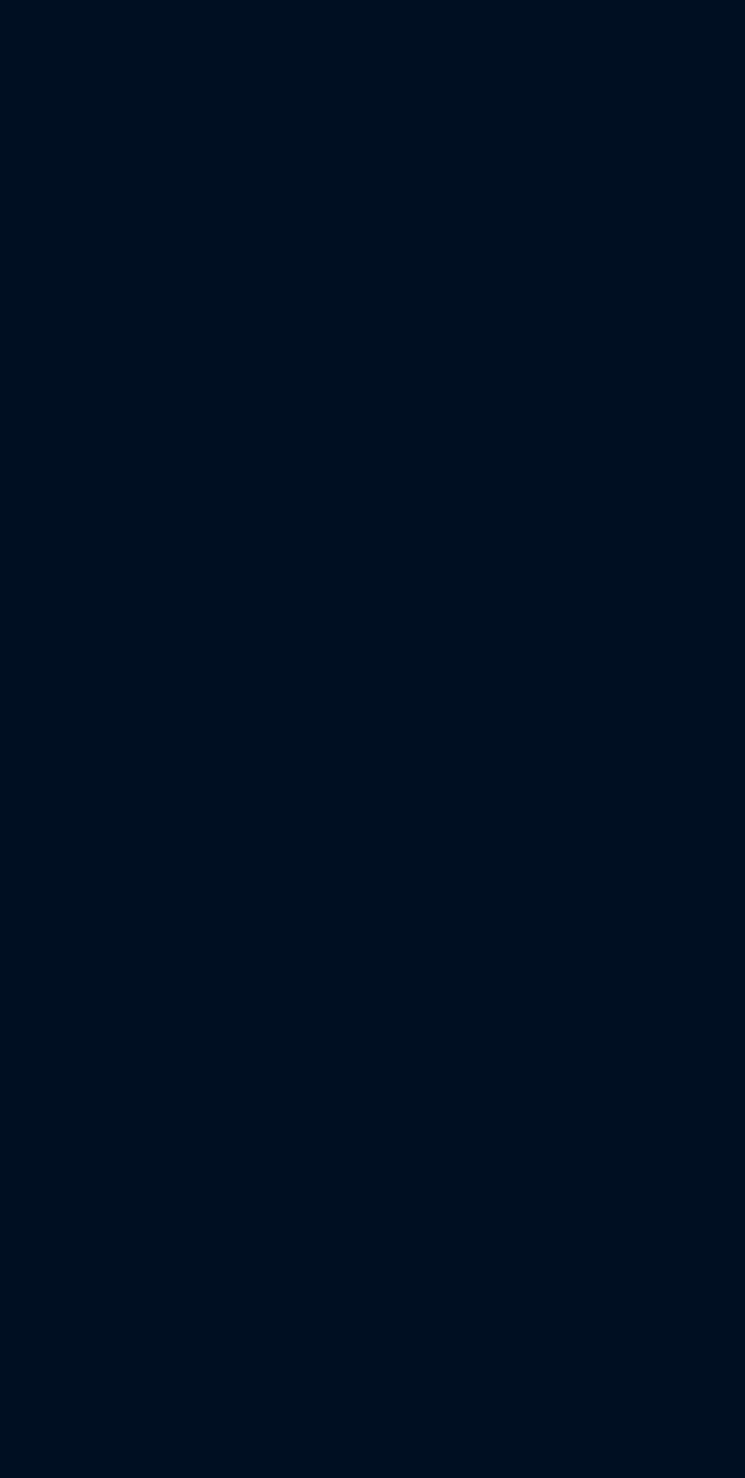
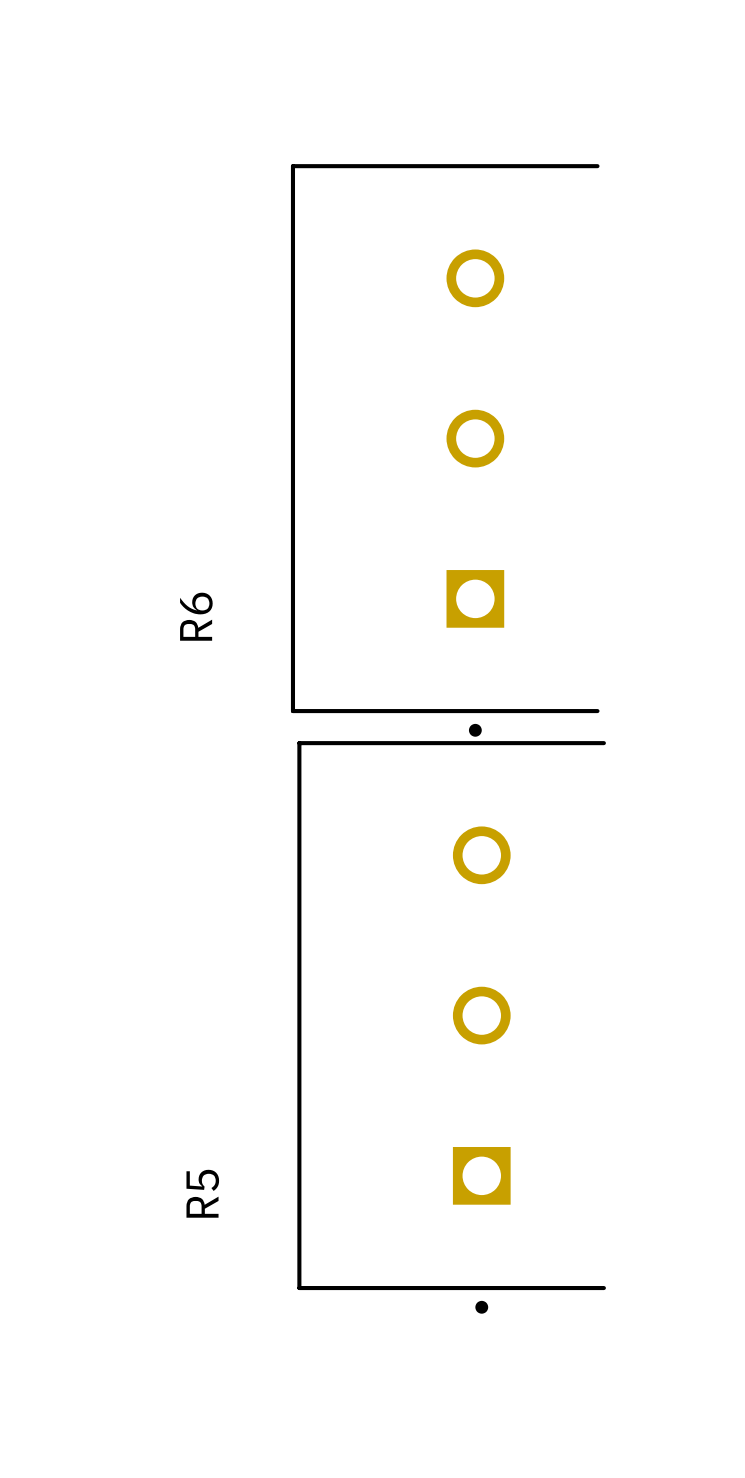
R6: none -> (445, 450)
R5: none -> (451, 1027)

